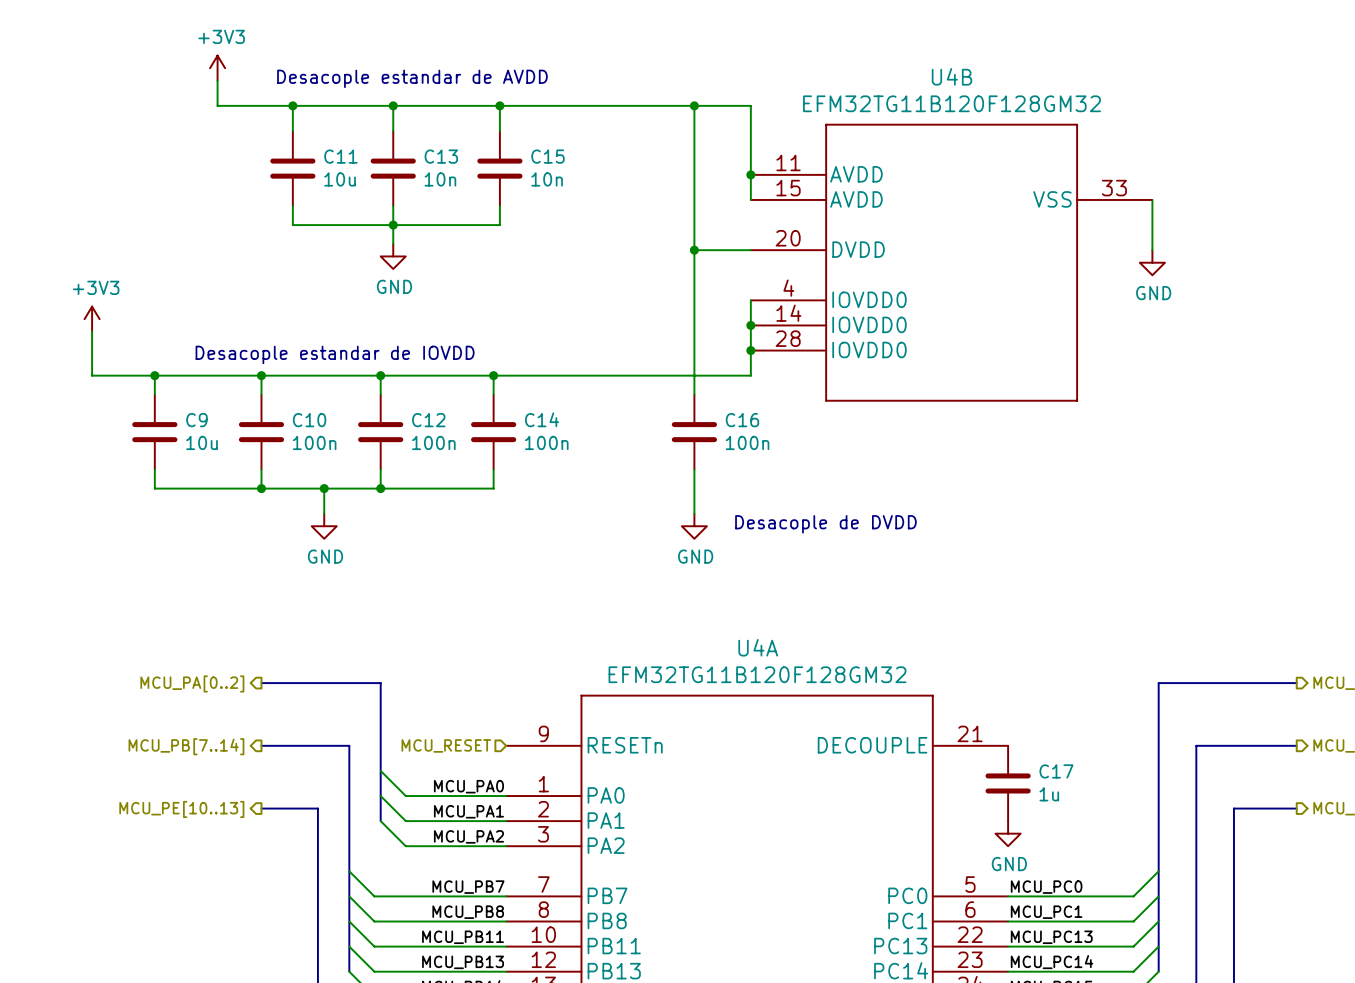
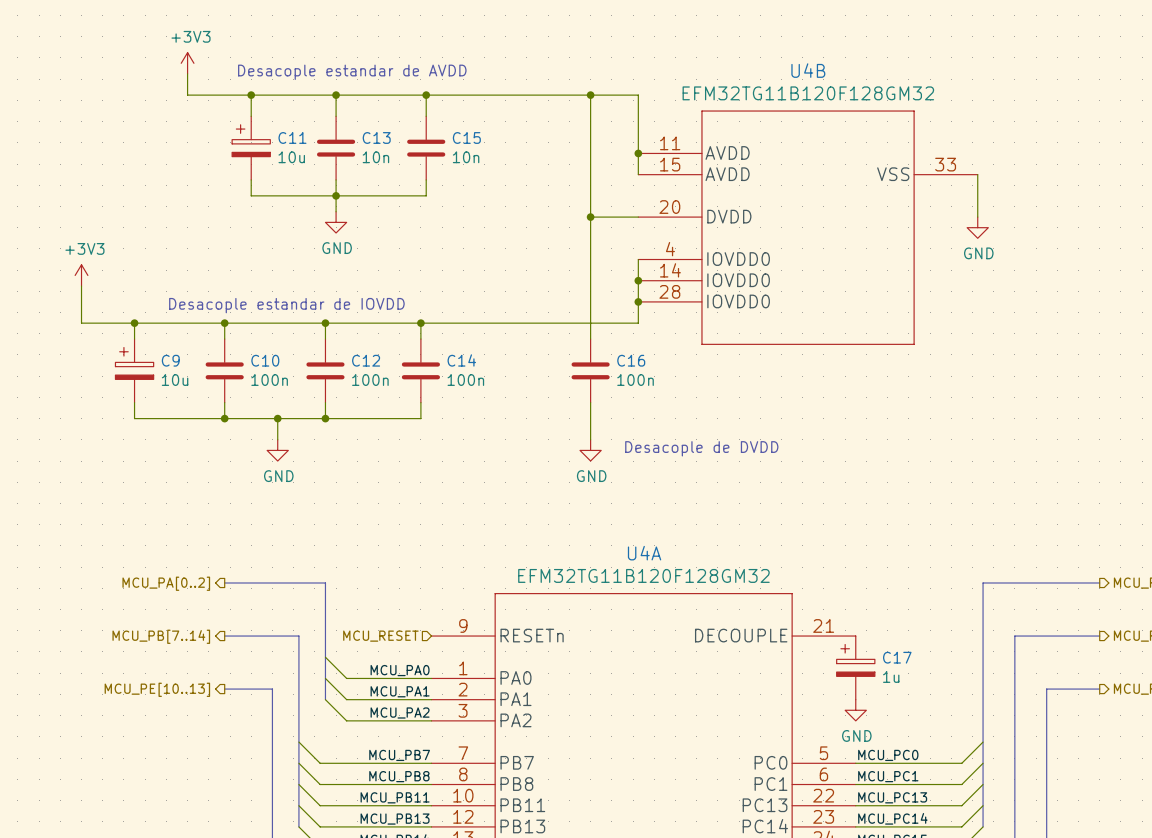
C11 symbol: [270, 130, 316, 207] -> [232, 116, 271, 180]
C9 symbol: [132, 394, 178, 470] -> [115, 339, 154, 403]
C17 symbol: [985, 745, 1031, 822] -> [836, 636, 875, 700]

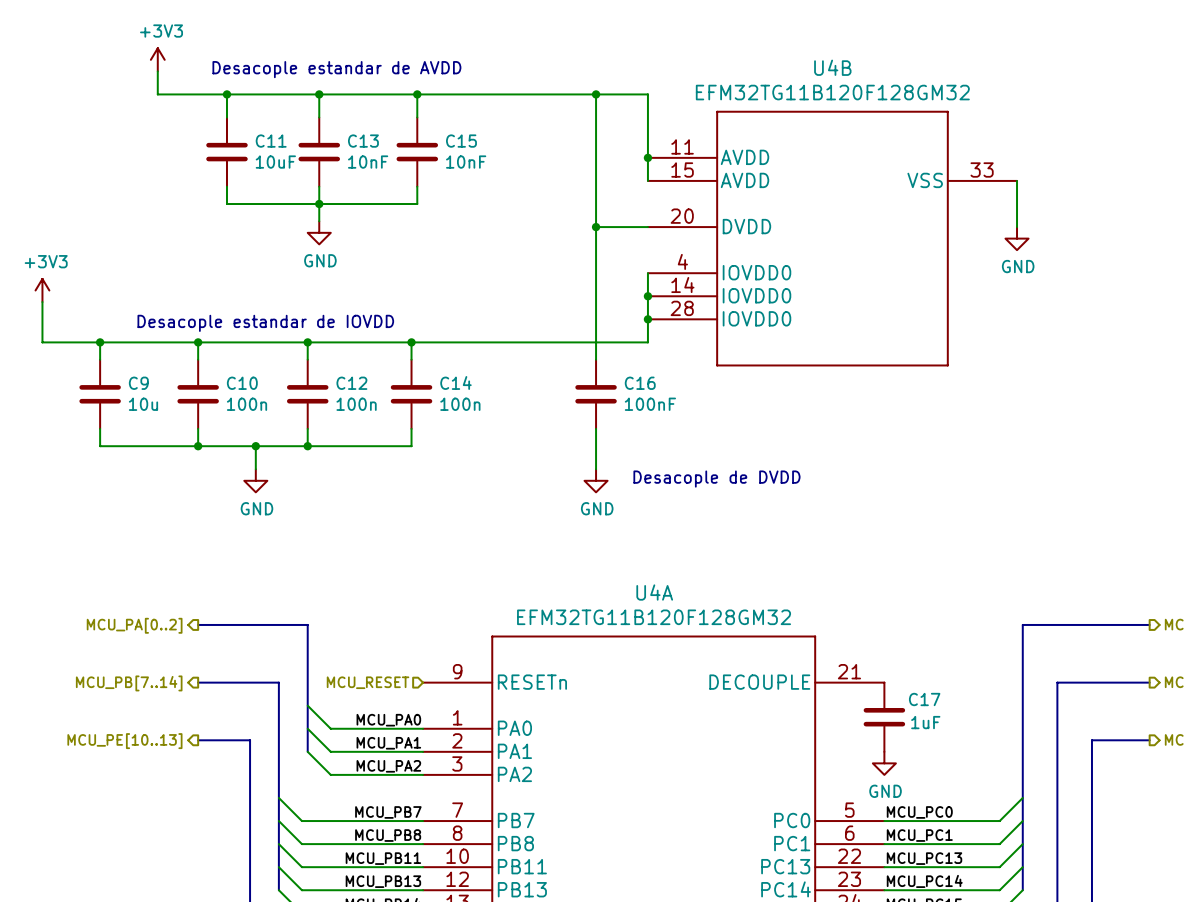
C11 symbol: [232, 116, 271, 180] -> [206, 117, 248, 187]
C11 value: 10u (291, 157) -> 10uF (275, 162)
C13 value: 10n (375, 157) -> 10nF (368, 162)
C15 value: 10n (466, 157) -> 10nF (466, 162)
C9 symbol: [115, 339, 154, 403] -> [79, 359, 121, 429]
C16 value: 100n (635, 380) -> 100nF (650, 404)
C17 symbol: [836, 636, 875, 700] -> [863, 682, 906, 752]
C17 value: 1u (891, 676) -> 1uF (925, 722)

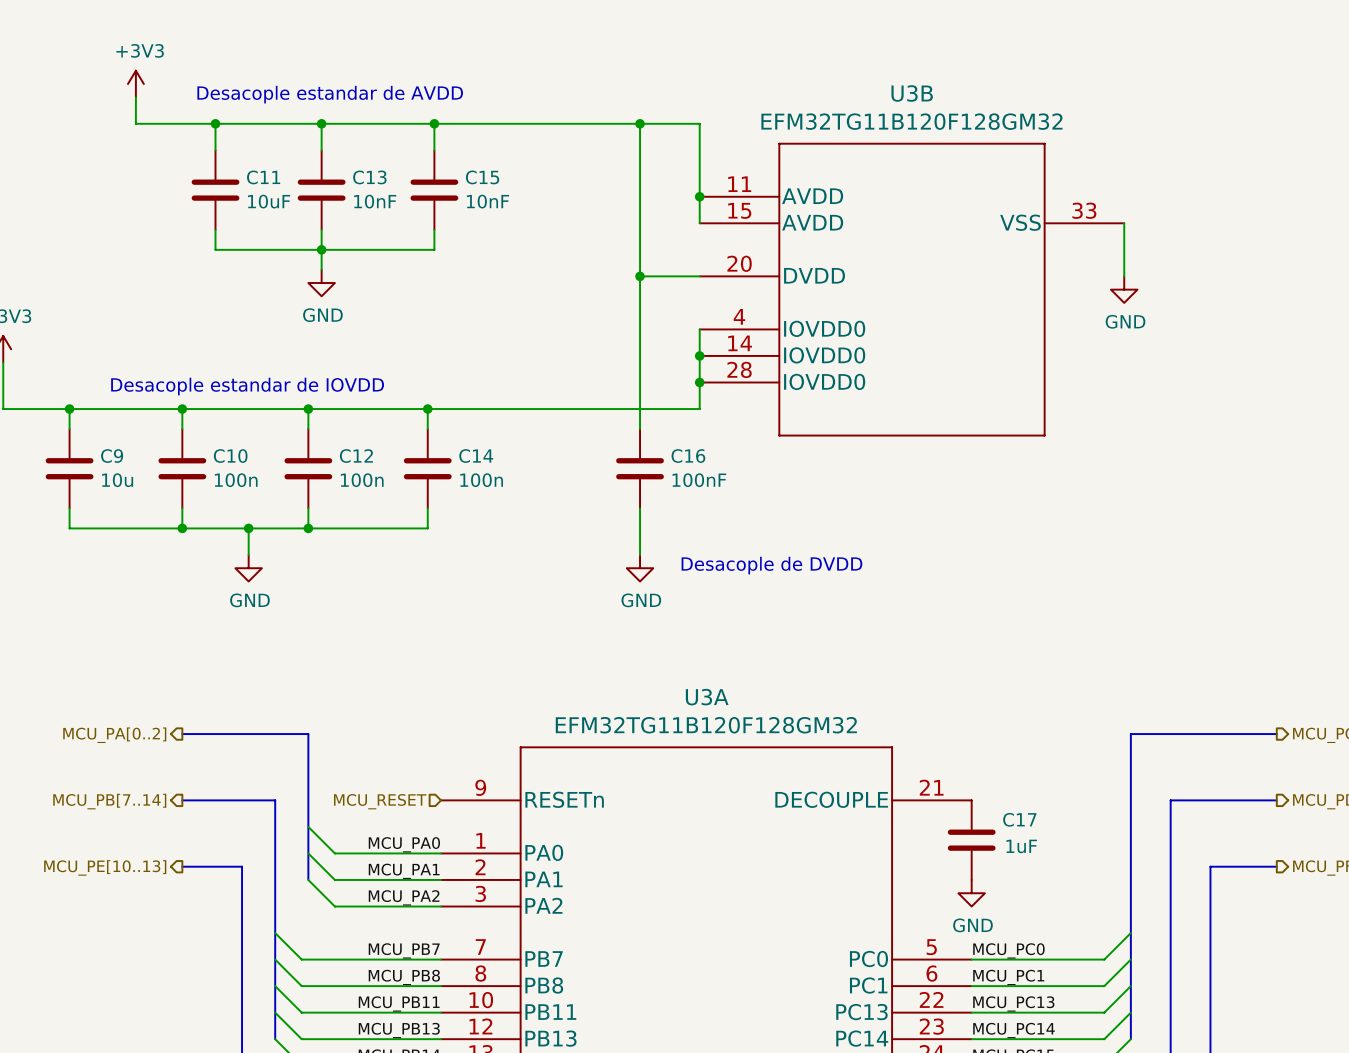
U4B name: U4B (832, 67) -> U3B (912, 93)
U4A name: U4A (654, 592) -> U3A (707, 697)

